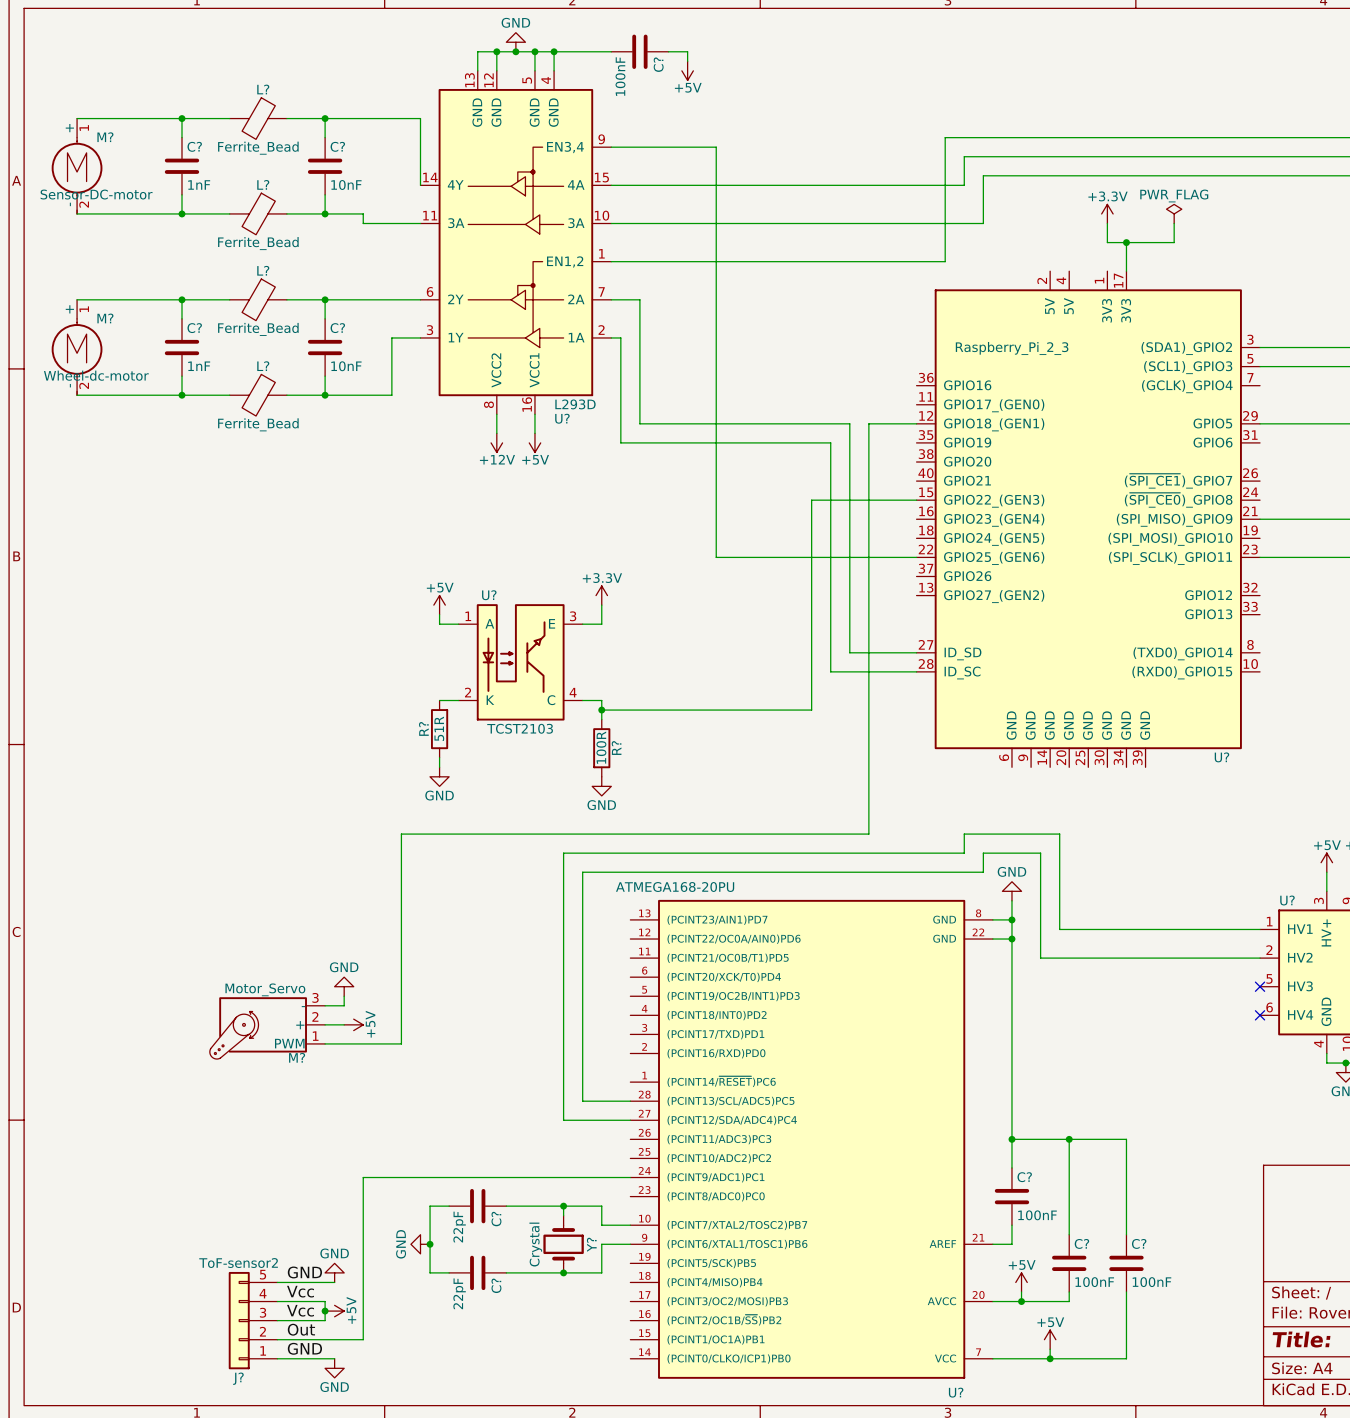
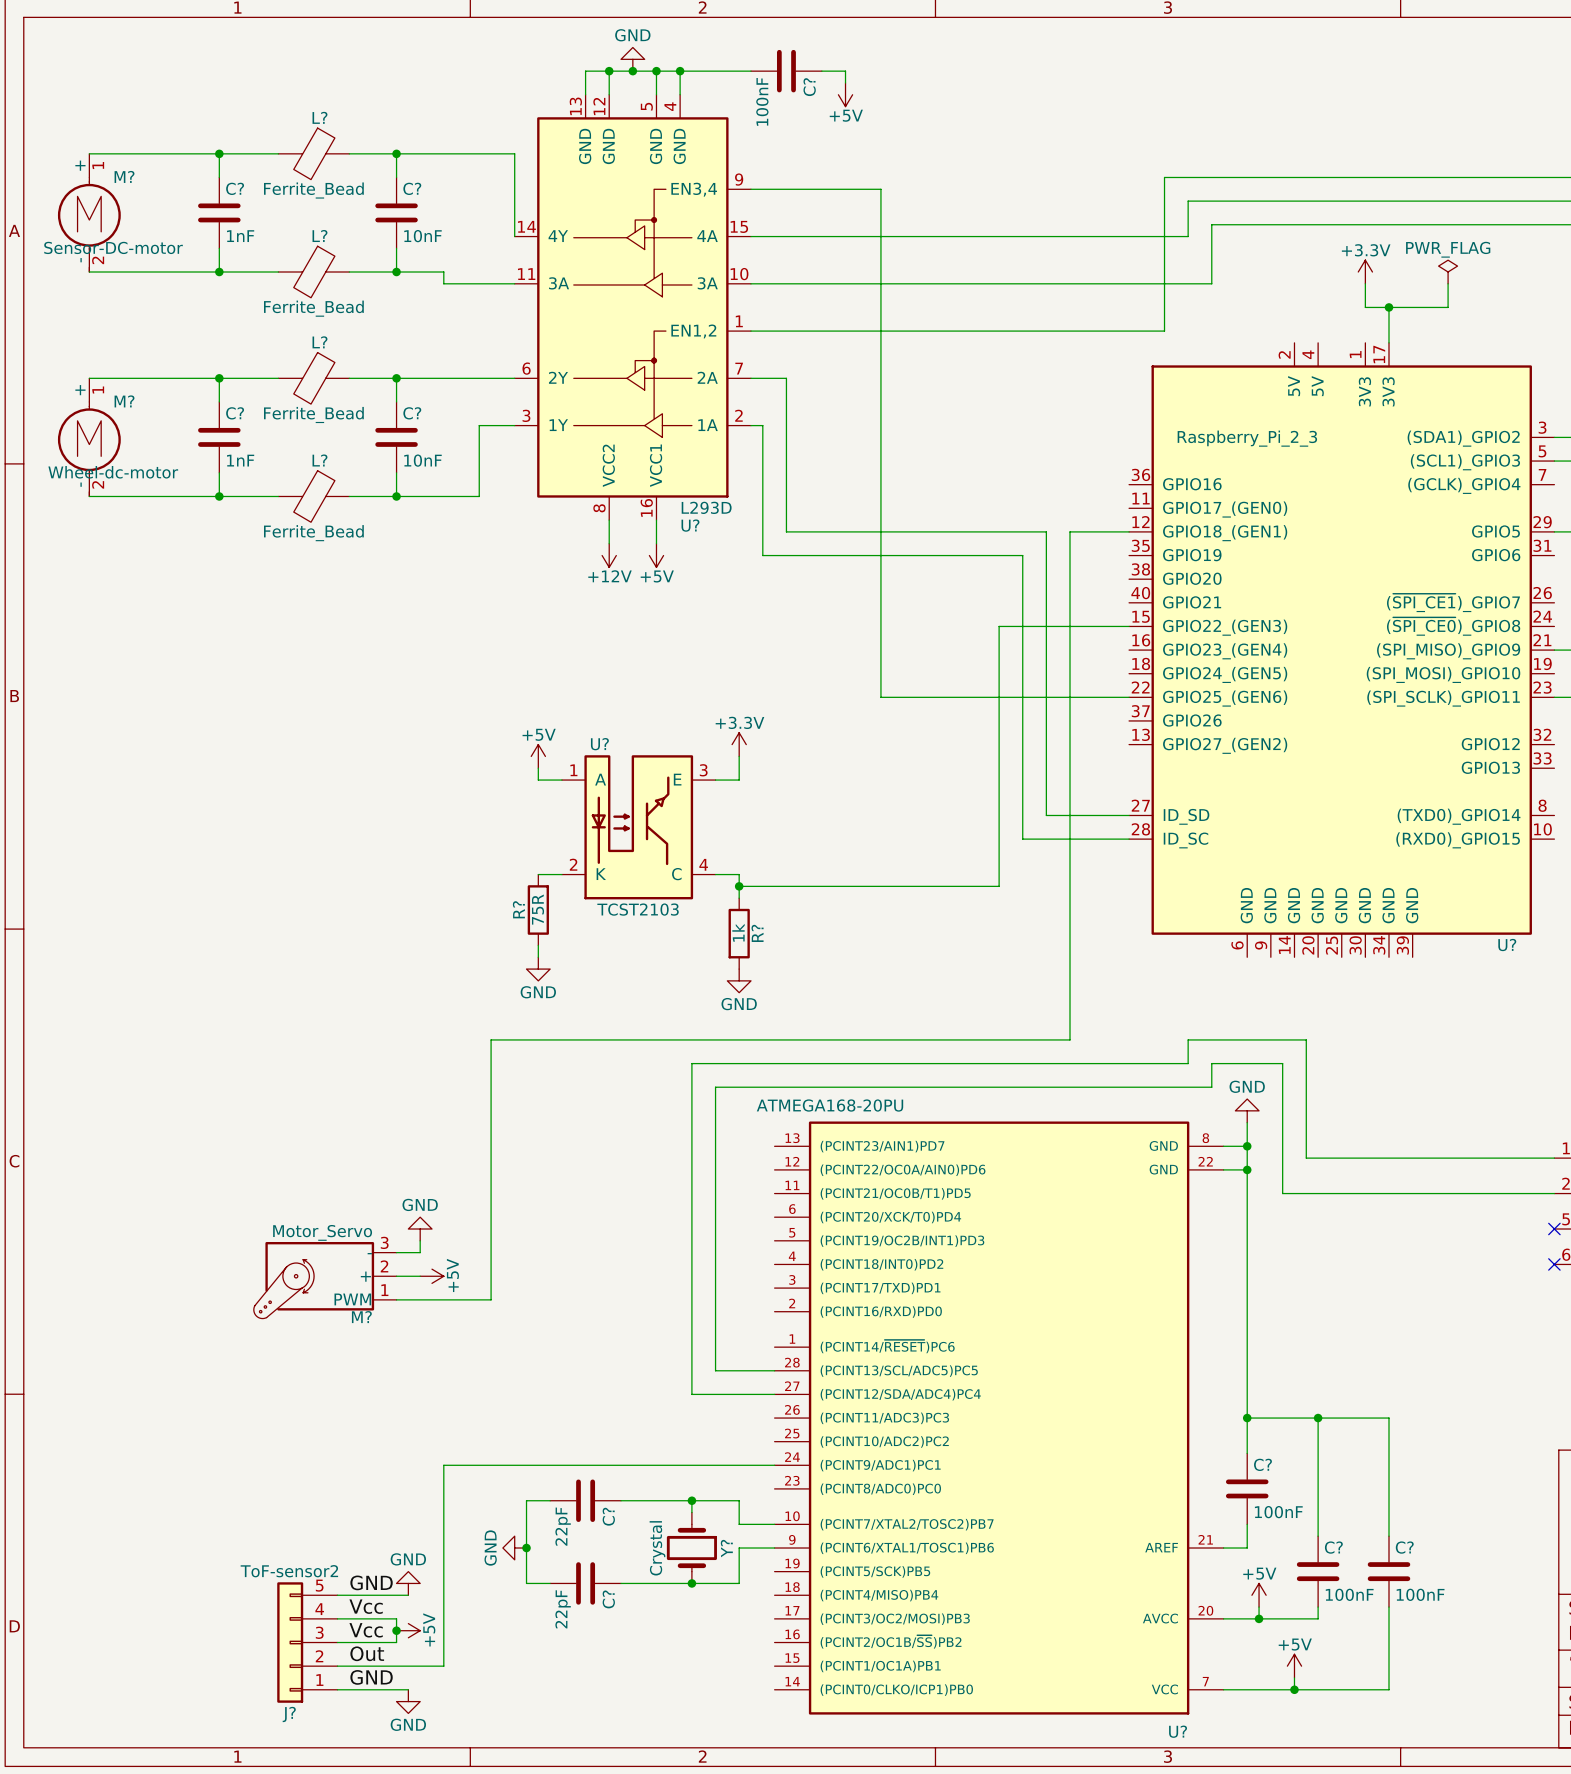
R? value: 51R (439, 728) -> 75R (538, 909)
R? value: 100R (601, 747) -> 1k (738, 932)

